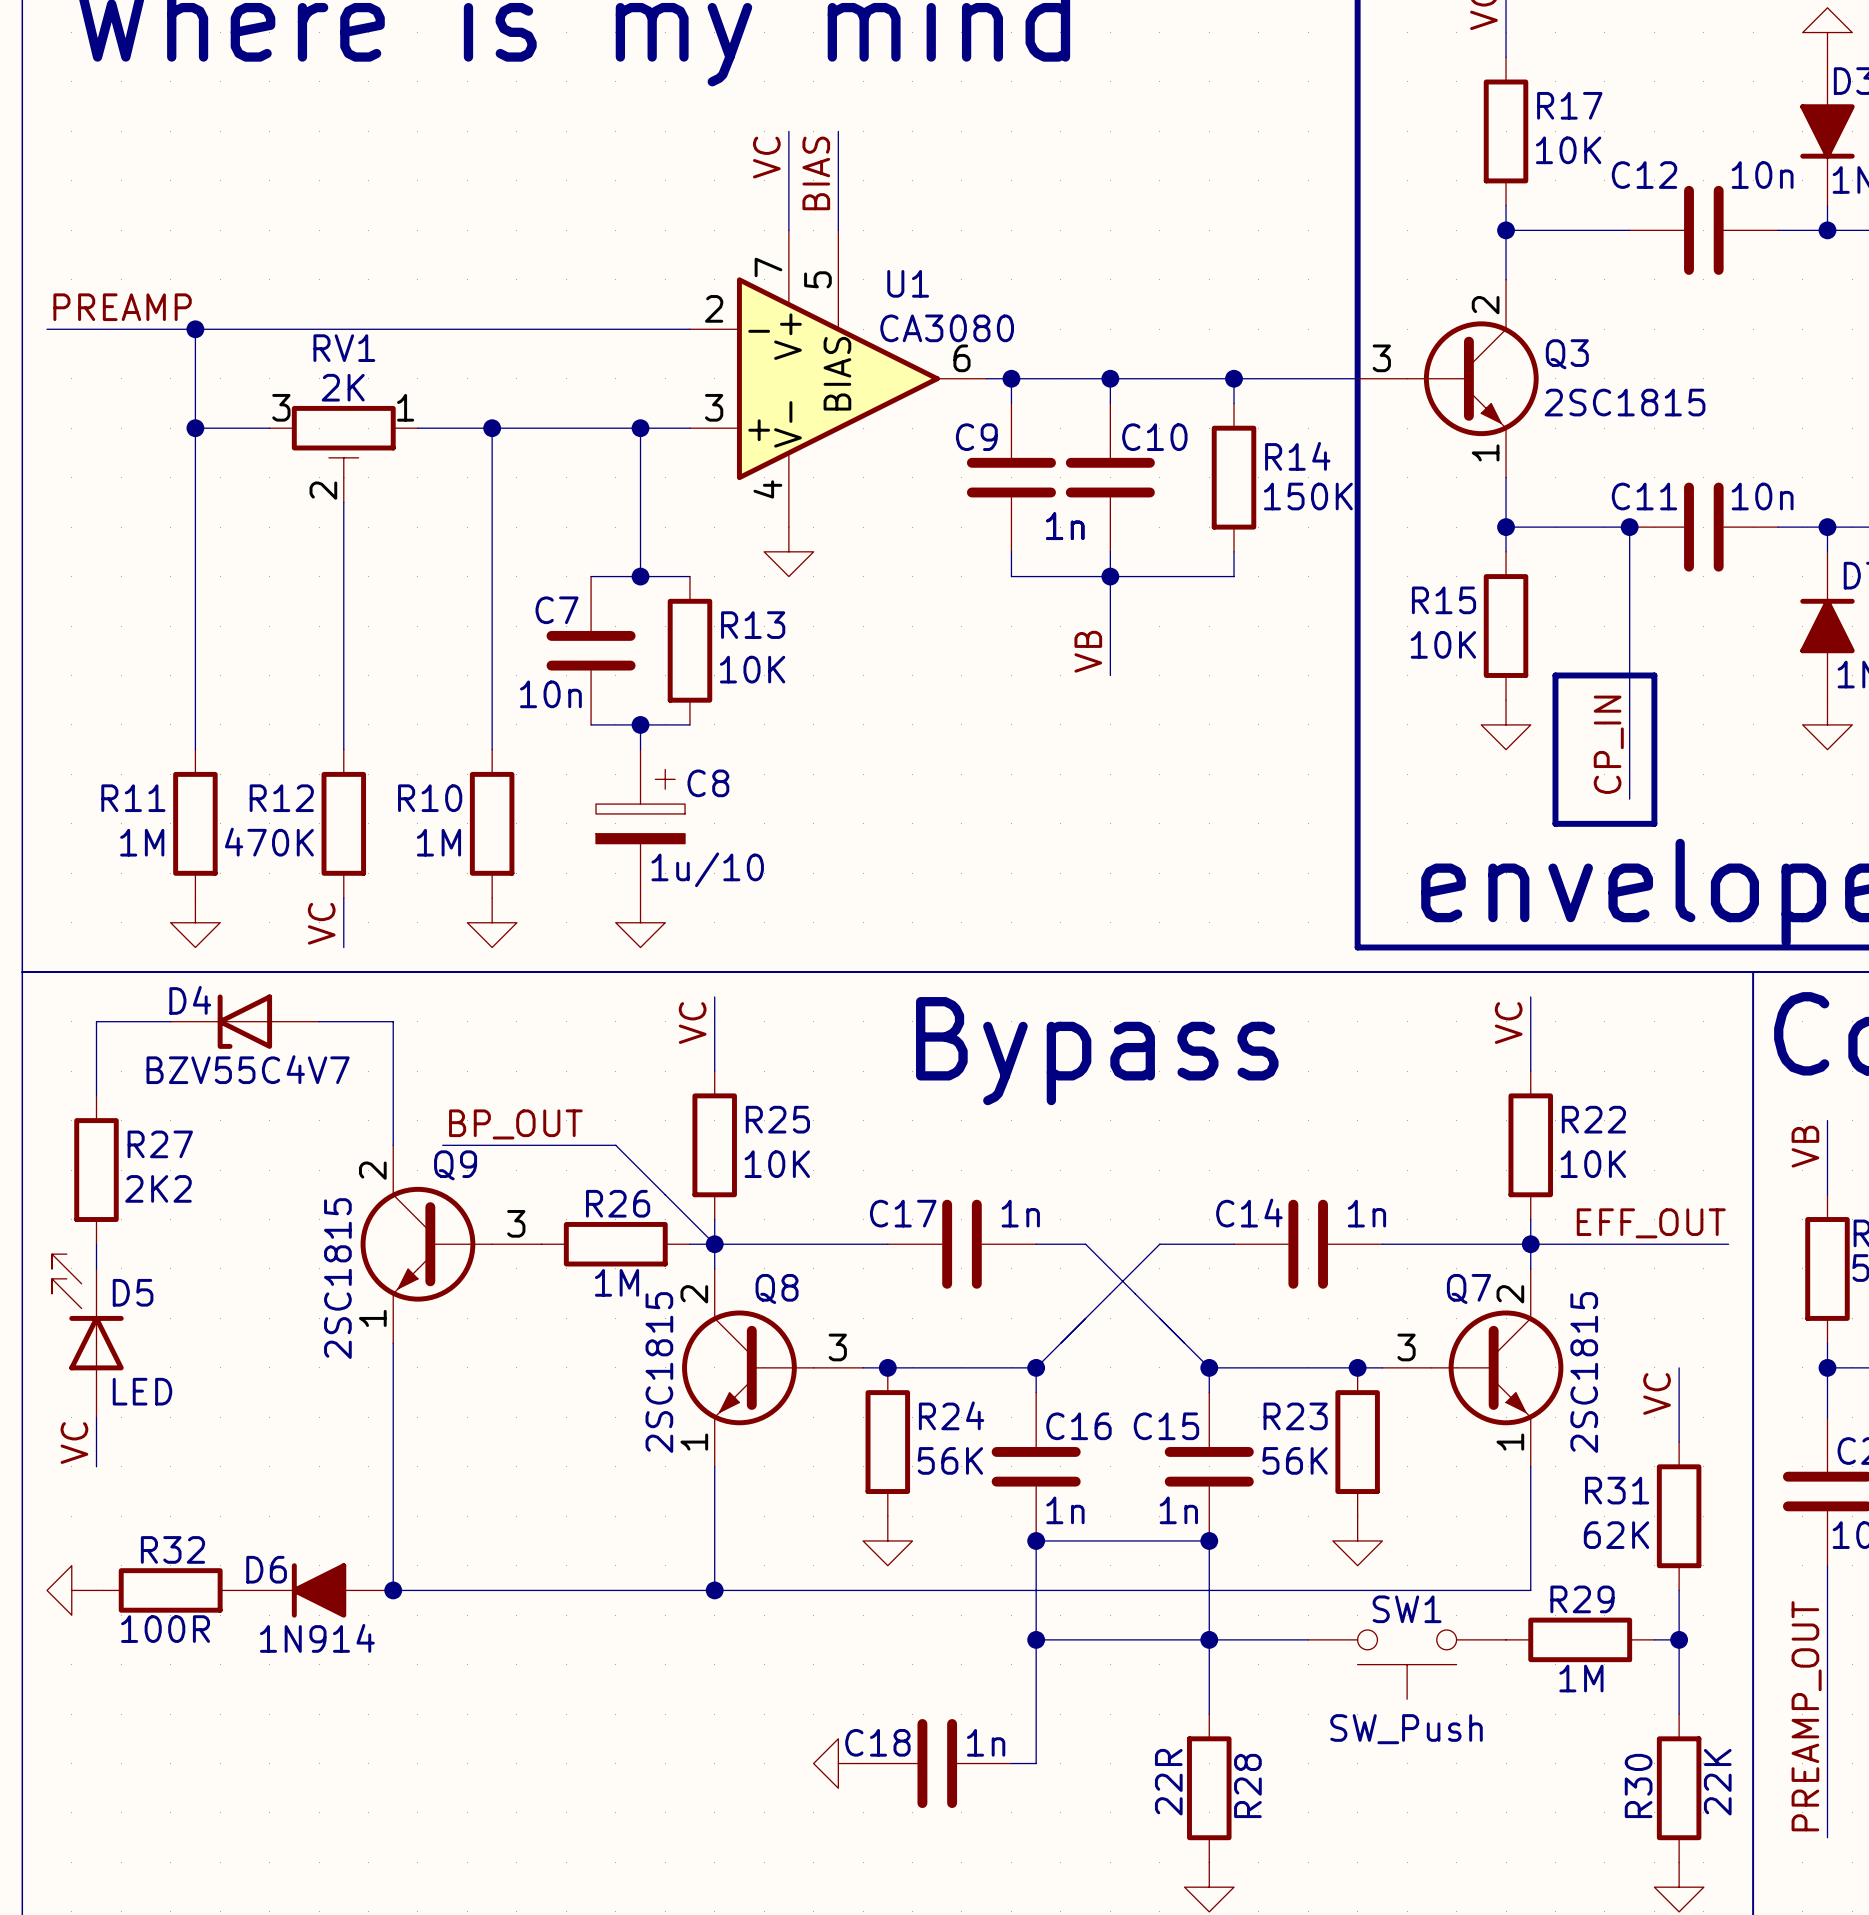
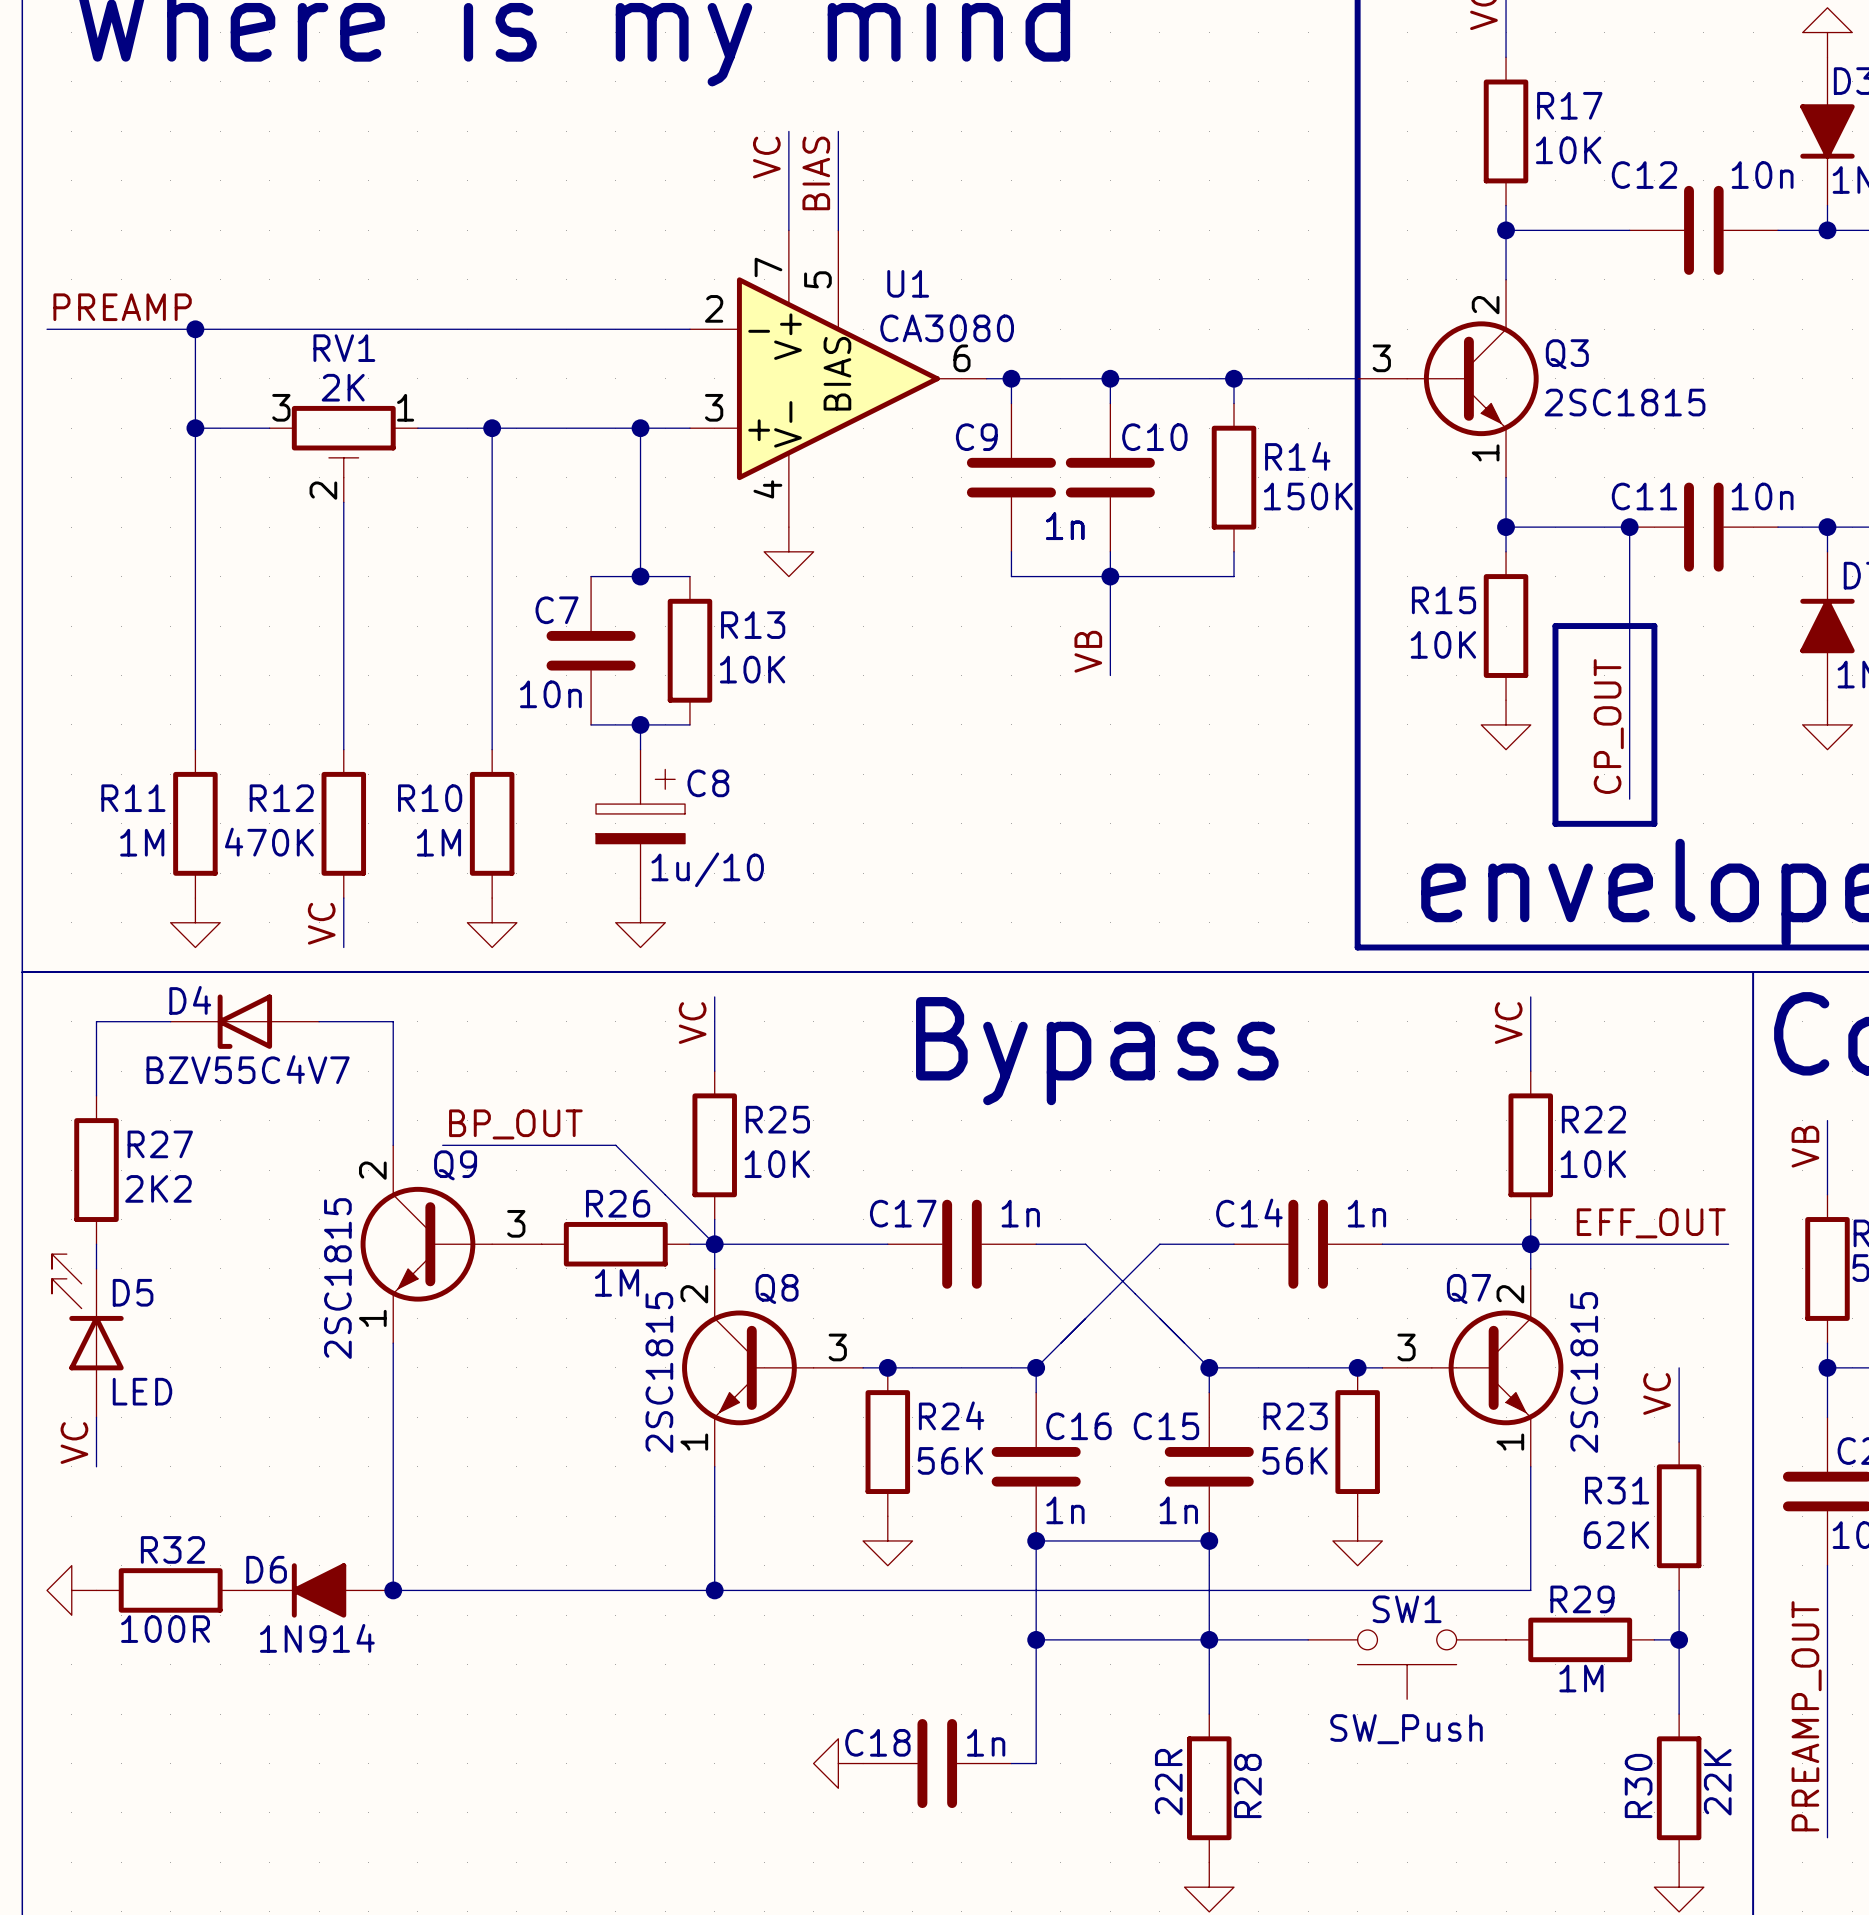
line: (1555, 675) (1654, 675) -> (1555, 675) (1555, 626) (1654, 626) (1654, 675)
label: CP_IN (1608, 744) -> CP_OUT (1608, 726)

